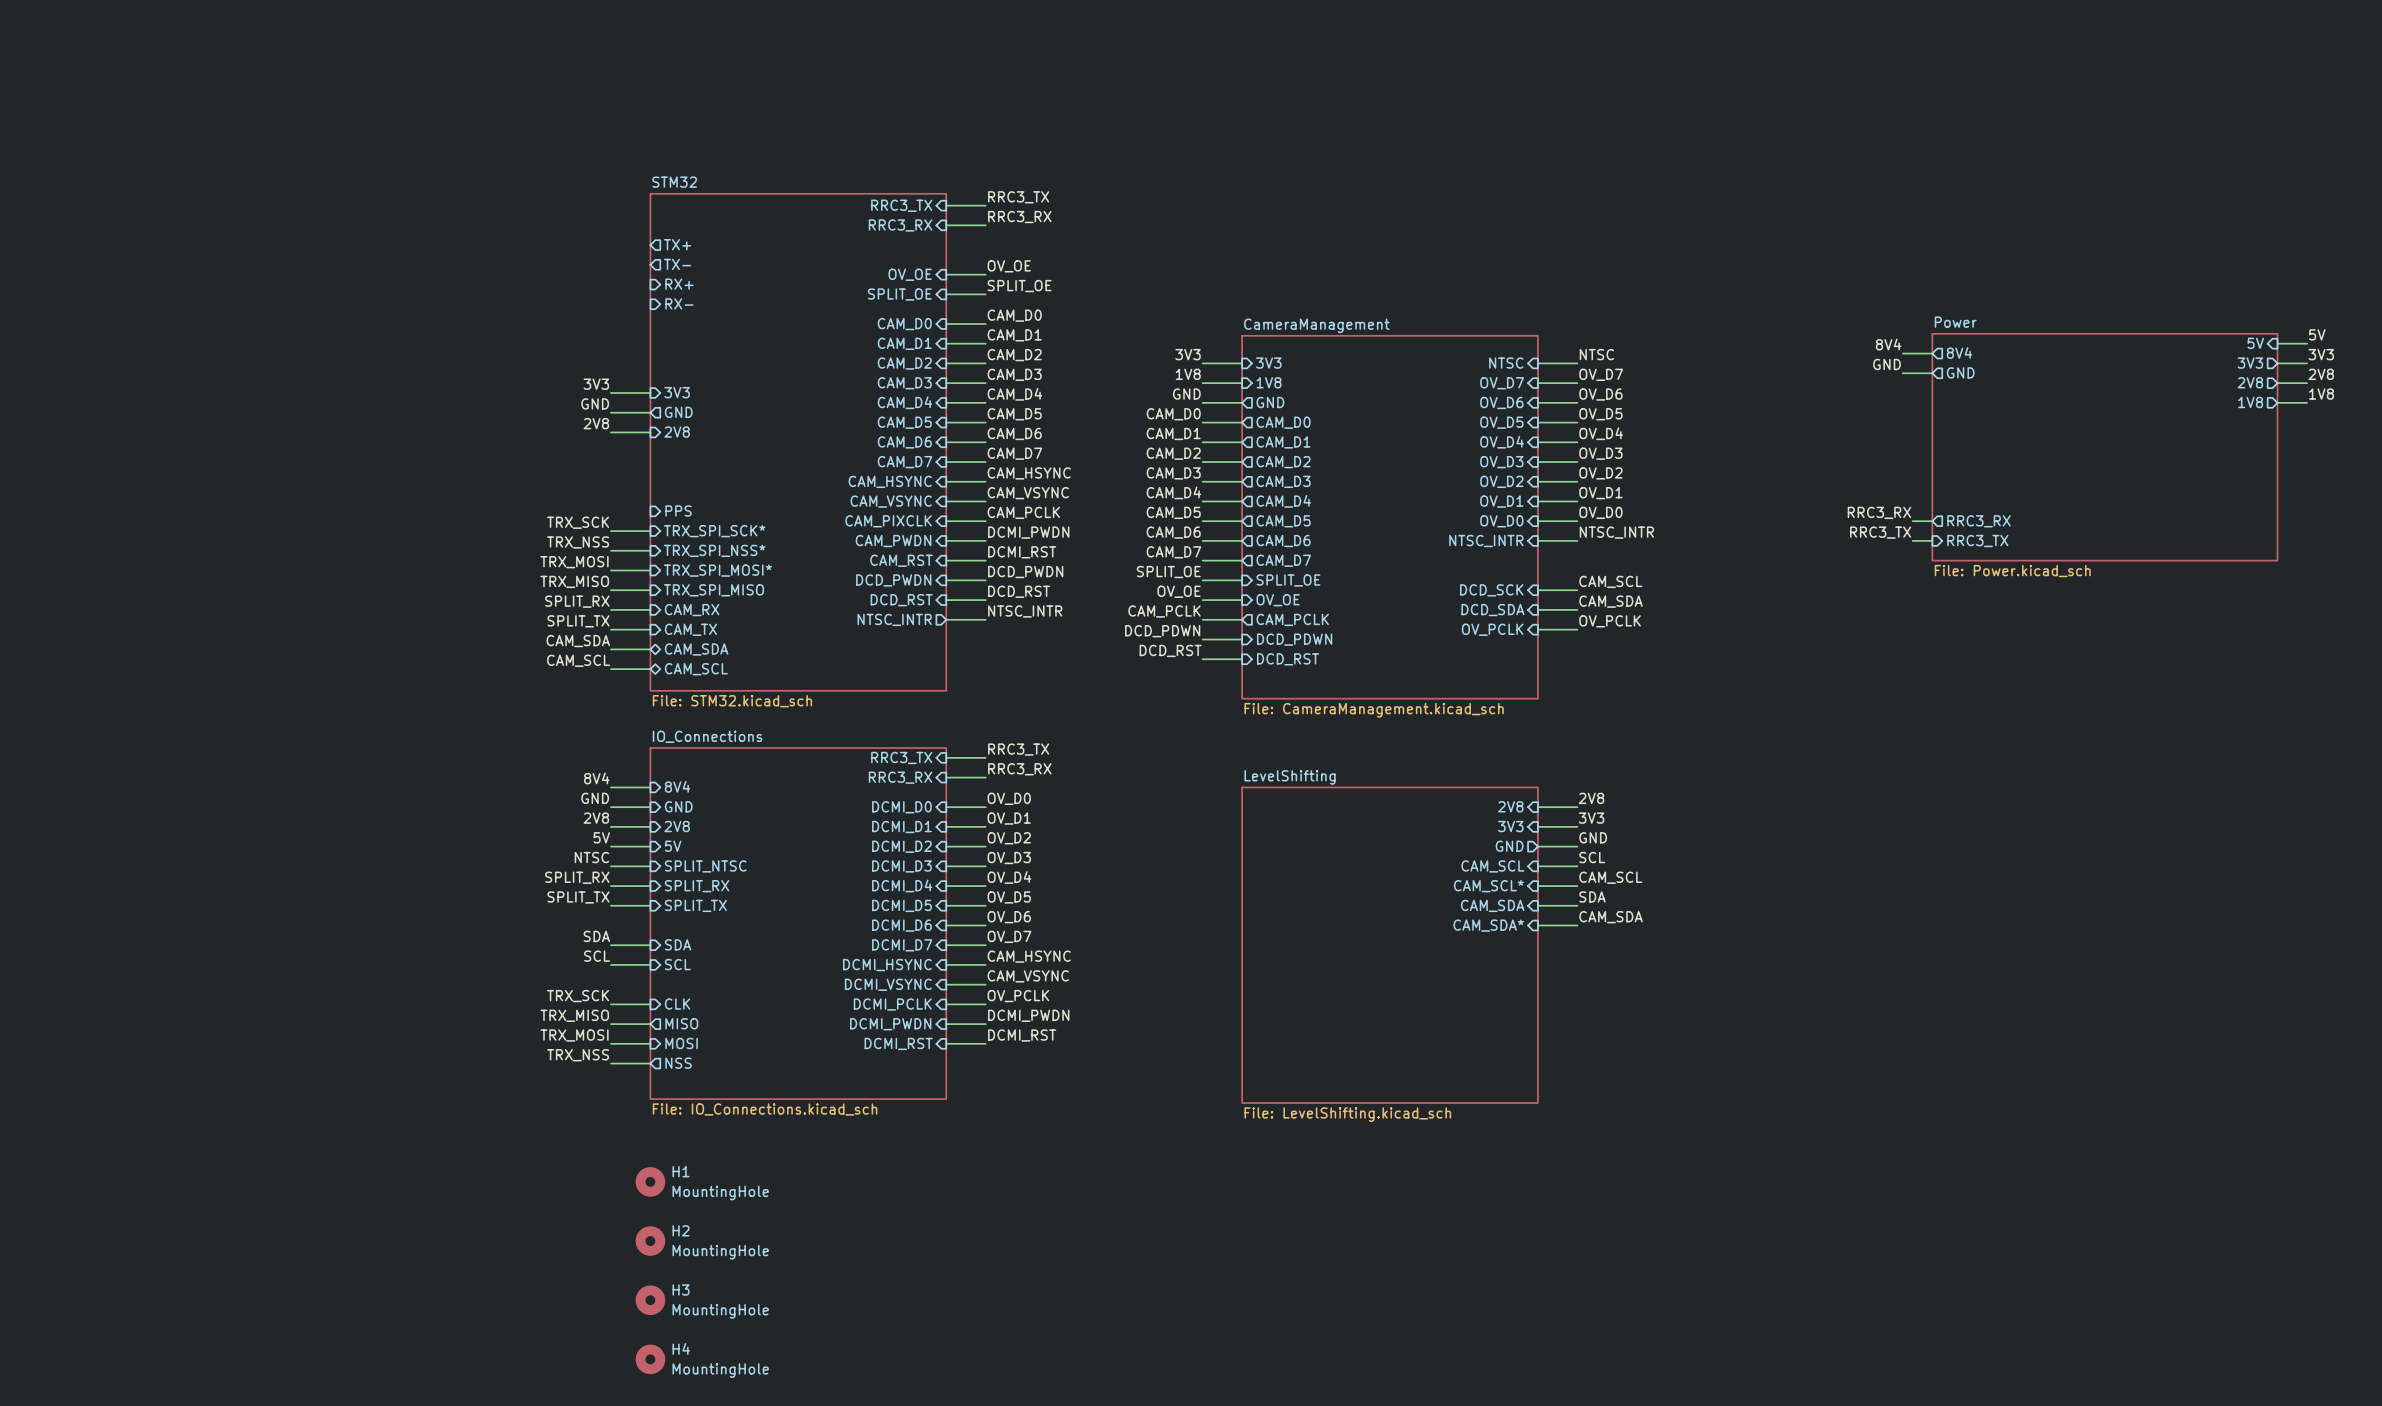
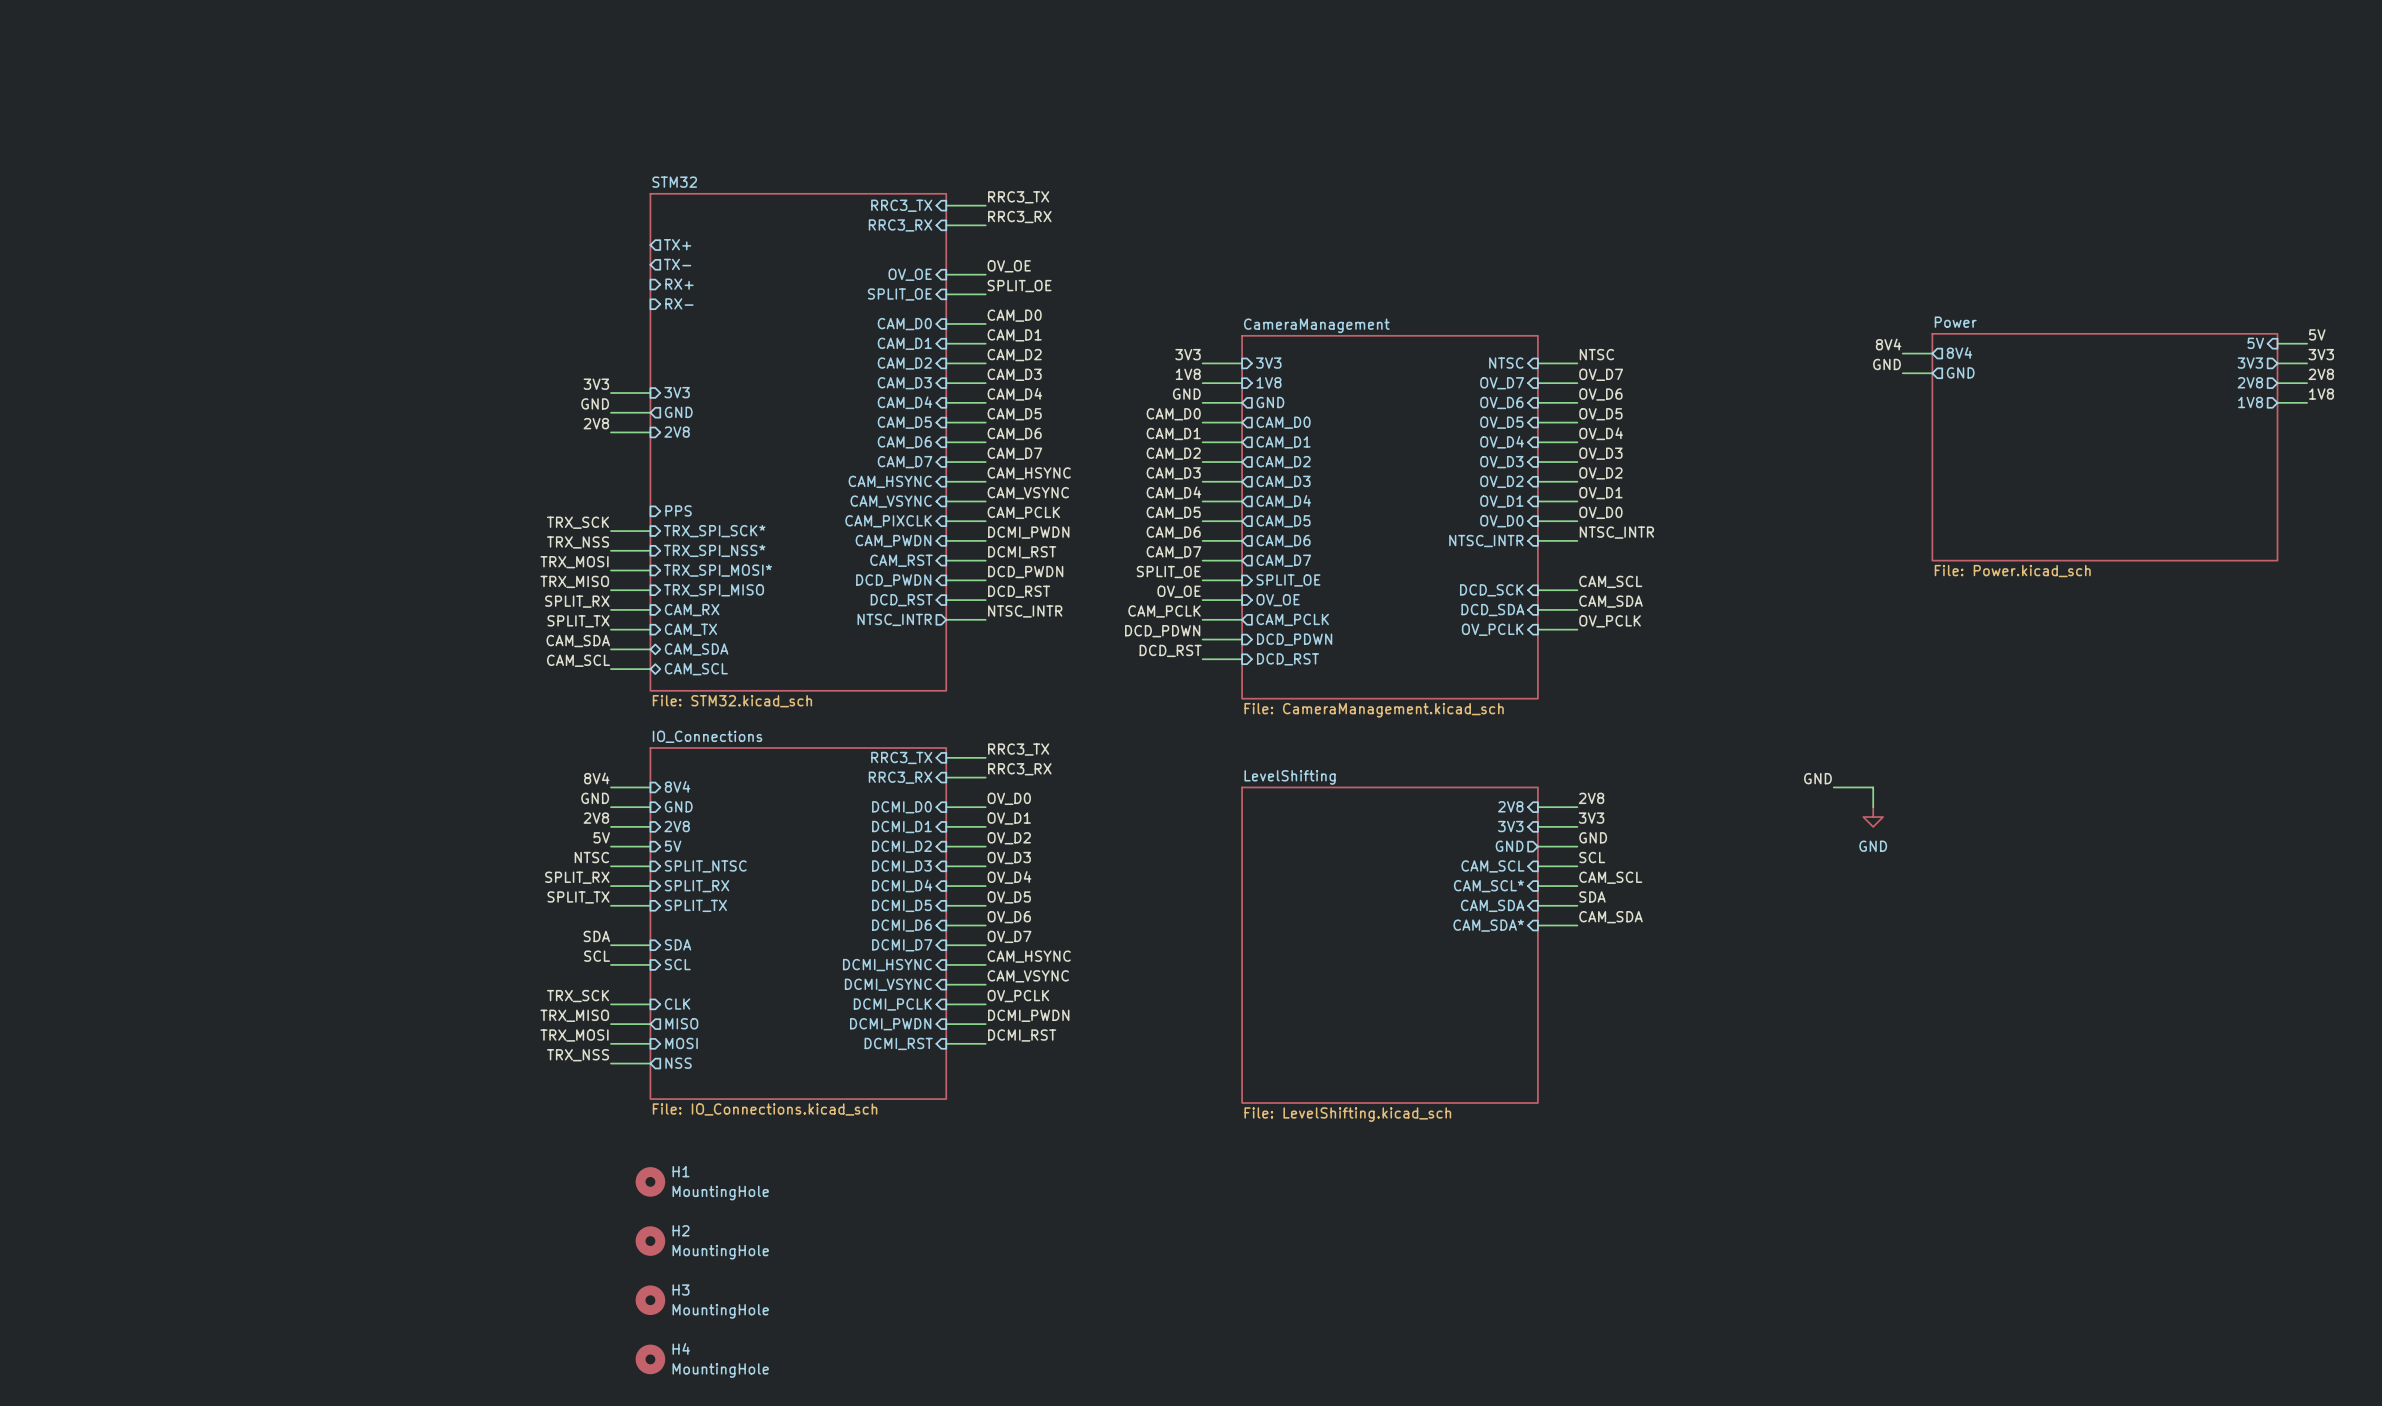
label: RRC3_RX (1879, 512) -> none
wire: (1912, 521) (1932, 521) -> none
sheet pin: RRC3_RX (1979, 521) -> none
label: RRC3_TX (1880, 532) -> none
wire: (1912, 540) (1932, 540) -> none
sheet pin: RRC3_TX (1977, 541) -> none
label: none -> GND (1817, 778)
wire: none -> (1833, 787) (1873, 787) (1873, 807)
power symbol: none -> GND (1873, 817)

